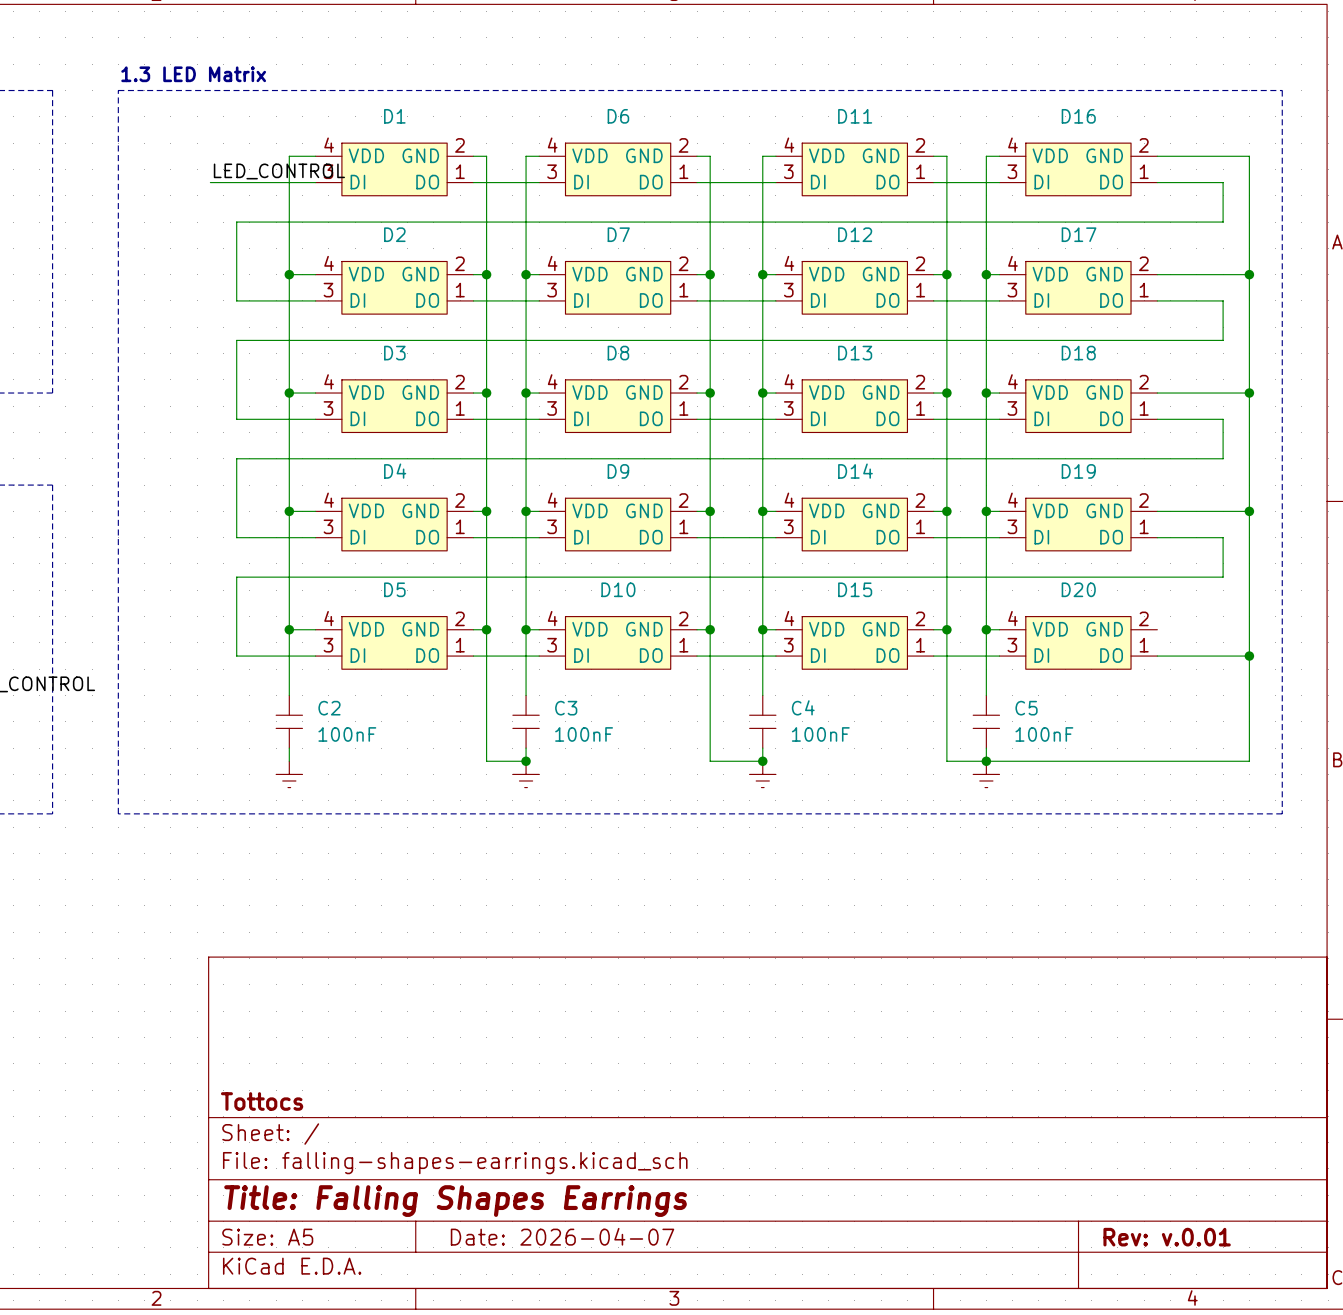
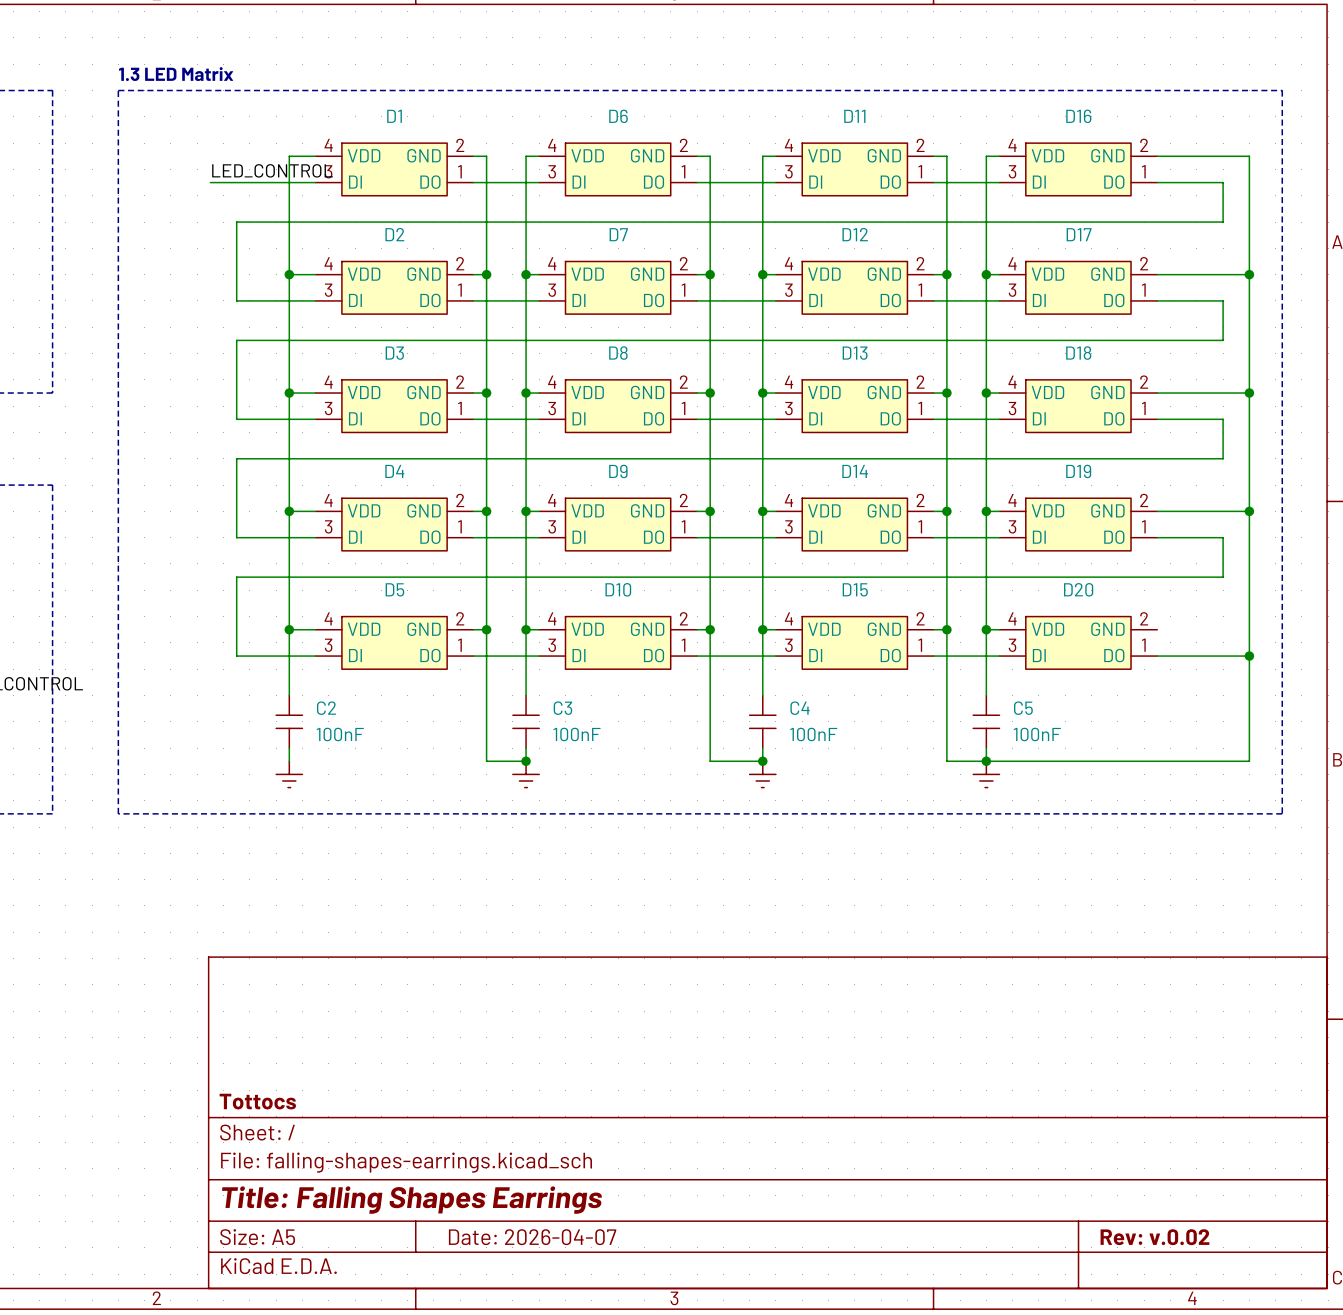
title block: Rev: v.0.01 (1167, 1237) -> Rev: v.0.02 (1154, 1237)

